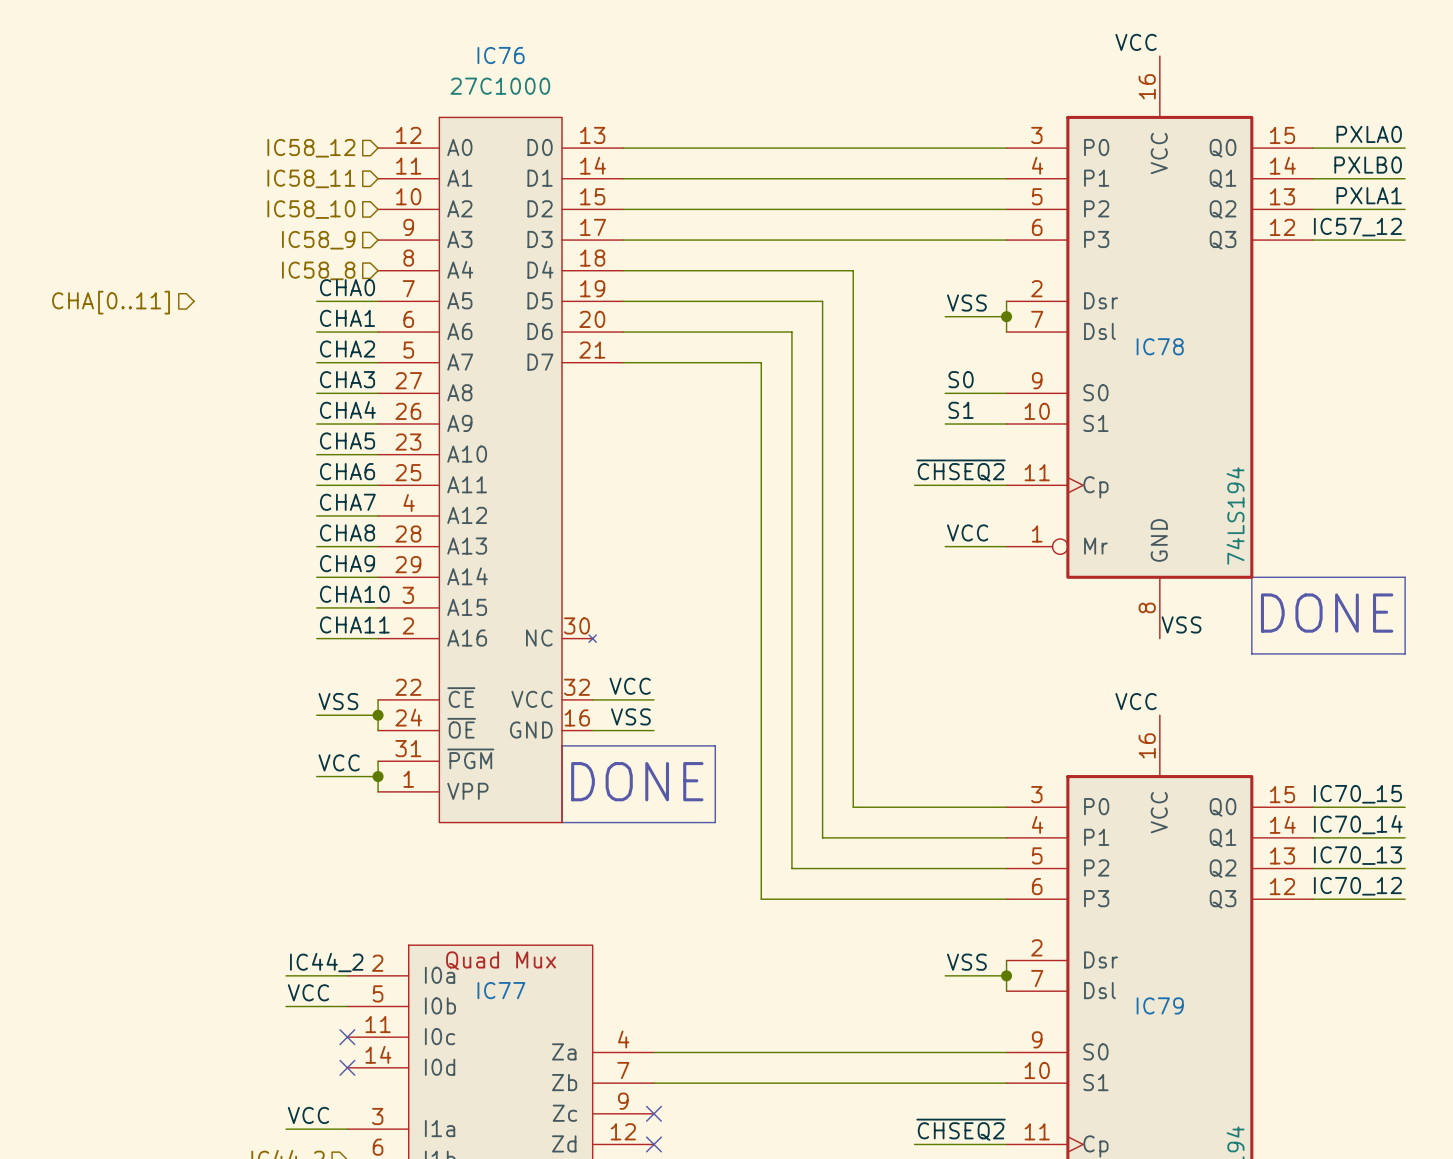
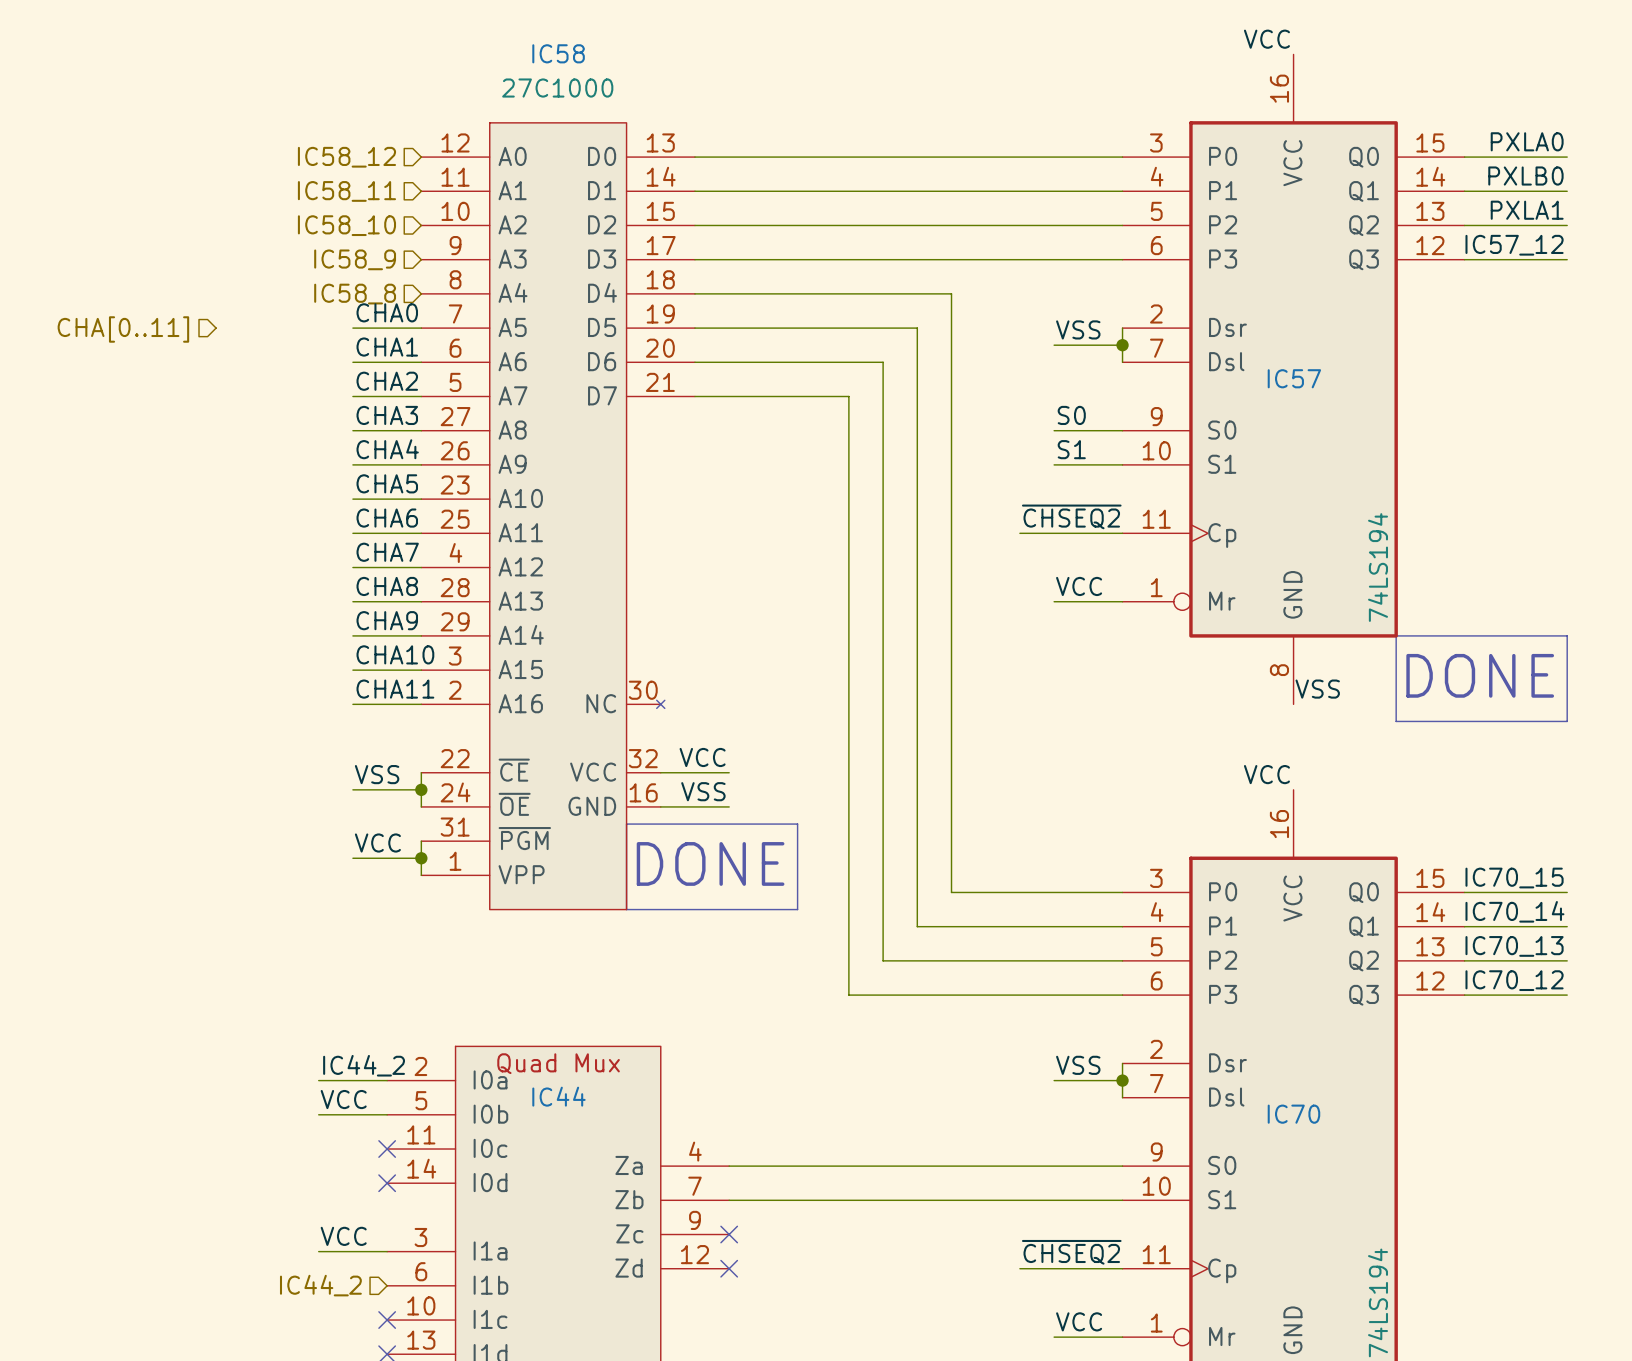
IC76 name: IC76 (501, 55) -> IC58 (558, 53)
IC78 name: IC78 (1160, 346) -> IC57 (1294, 378)
IC77 name: IC77 (501, 990) -> IC44 (558, 1096)
IC79 name: IC79 (1160, 1005) -> IC70 (1293, 1114)

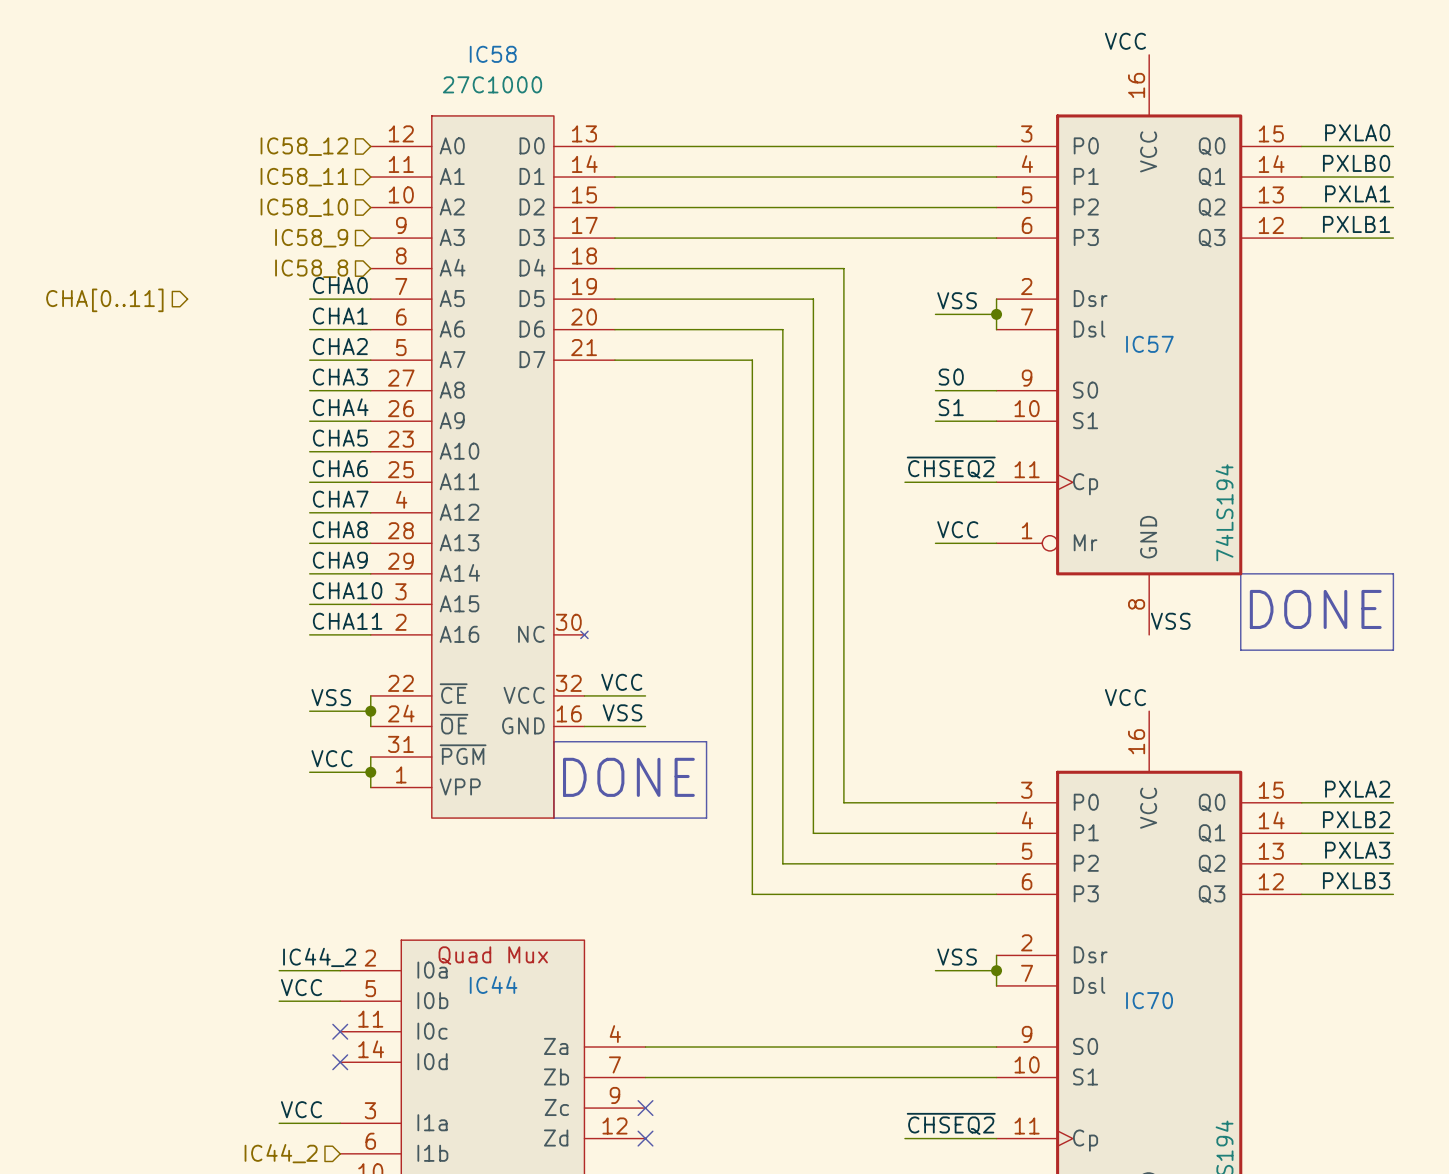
label: IC57_12 (1514, 245) -> PXLB1 (1356, 224)
label: IC70_15 (1514, 878) -> PXLA2 (1357, 789)
label: IC70_14 (1514, 911) -> PXLB2 (1356, 819)
label: IC70_13 (1514, 946) -> PXLA3 (1357, 850)
label: IC70_12 (1514, 980) -> PXLB3 (1356, 880)

